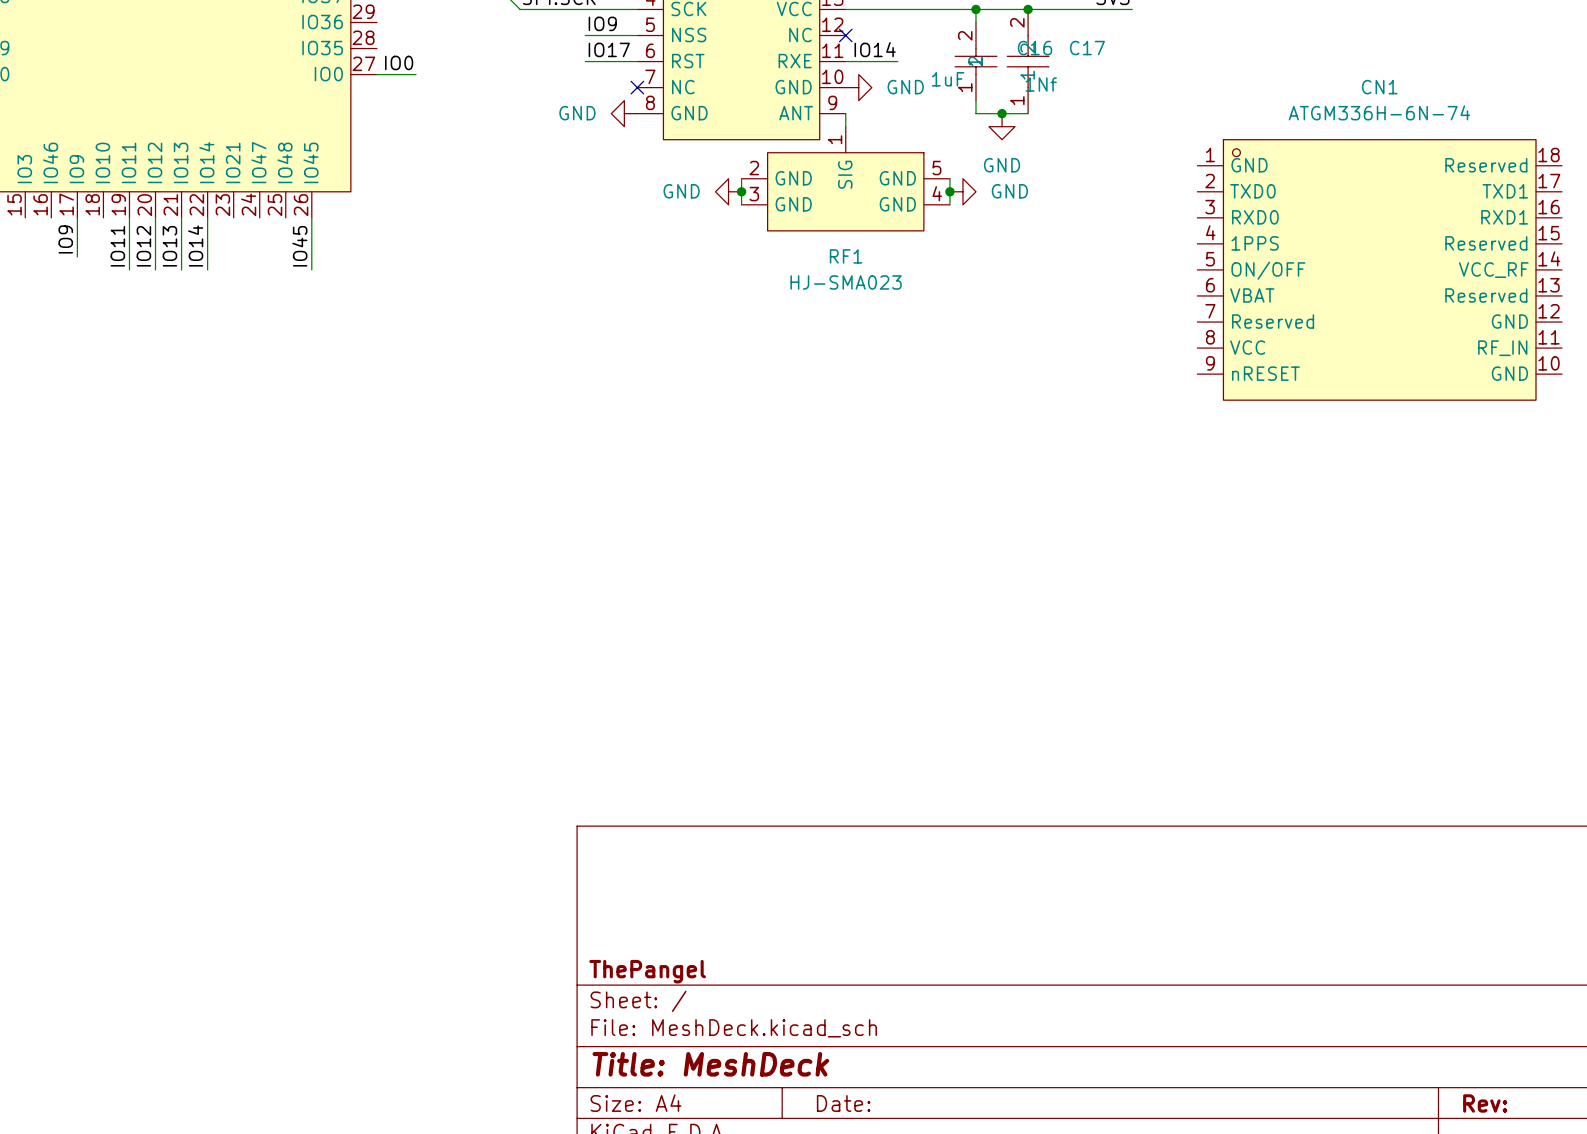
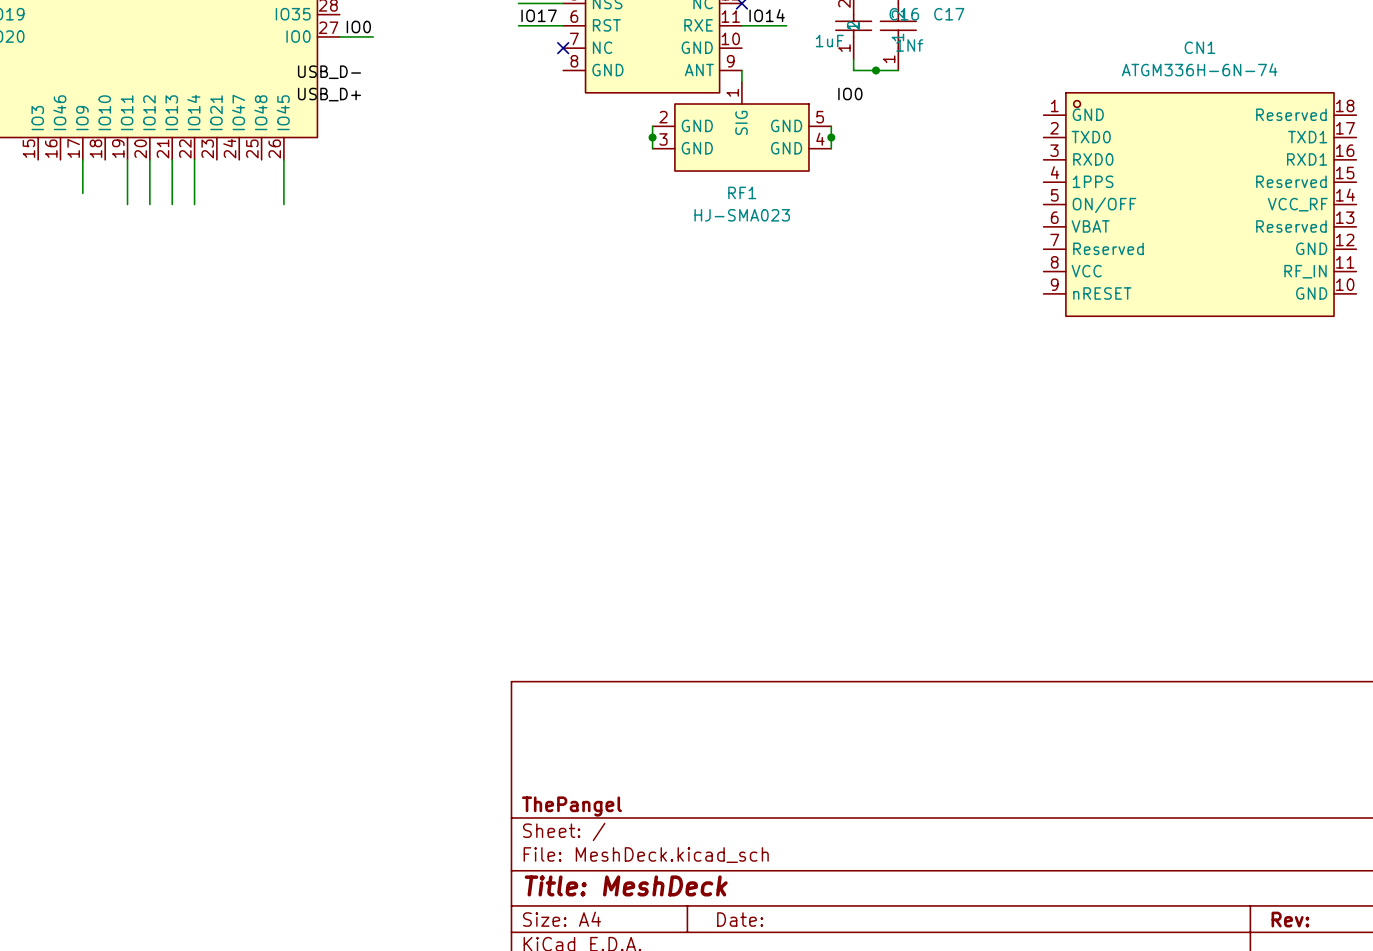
power symbol: GND (858, 87) -> none
power symbol: GND (624, 113) -> none
label: none -> USB_D- (329, 72)
power symbol: GND (1002, 126) -> none
label: none -> USB_D+ (329, 94)
label: none -> IO0 (850, 94)
power symbol: GND (728, 191) -> none
power symbol: GND (962, 191) -> none
label: IO9 (65, 239) -> none
label: IO14 (195, 245) -> none
label: IO11 (117, 246) -> none
label: IO12 (143, 246) -> none
label: IO13 (169, 246) -> none
label: IO45 (299, 246) -> none

